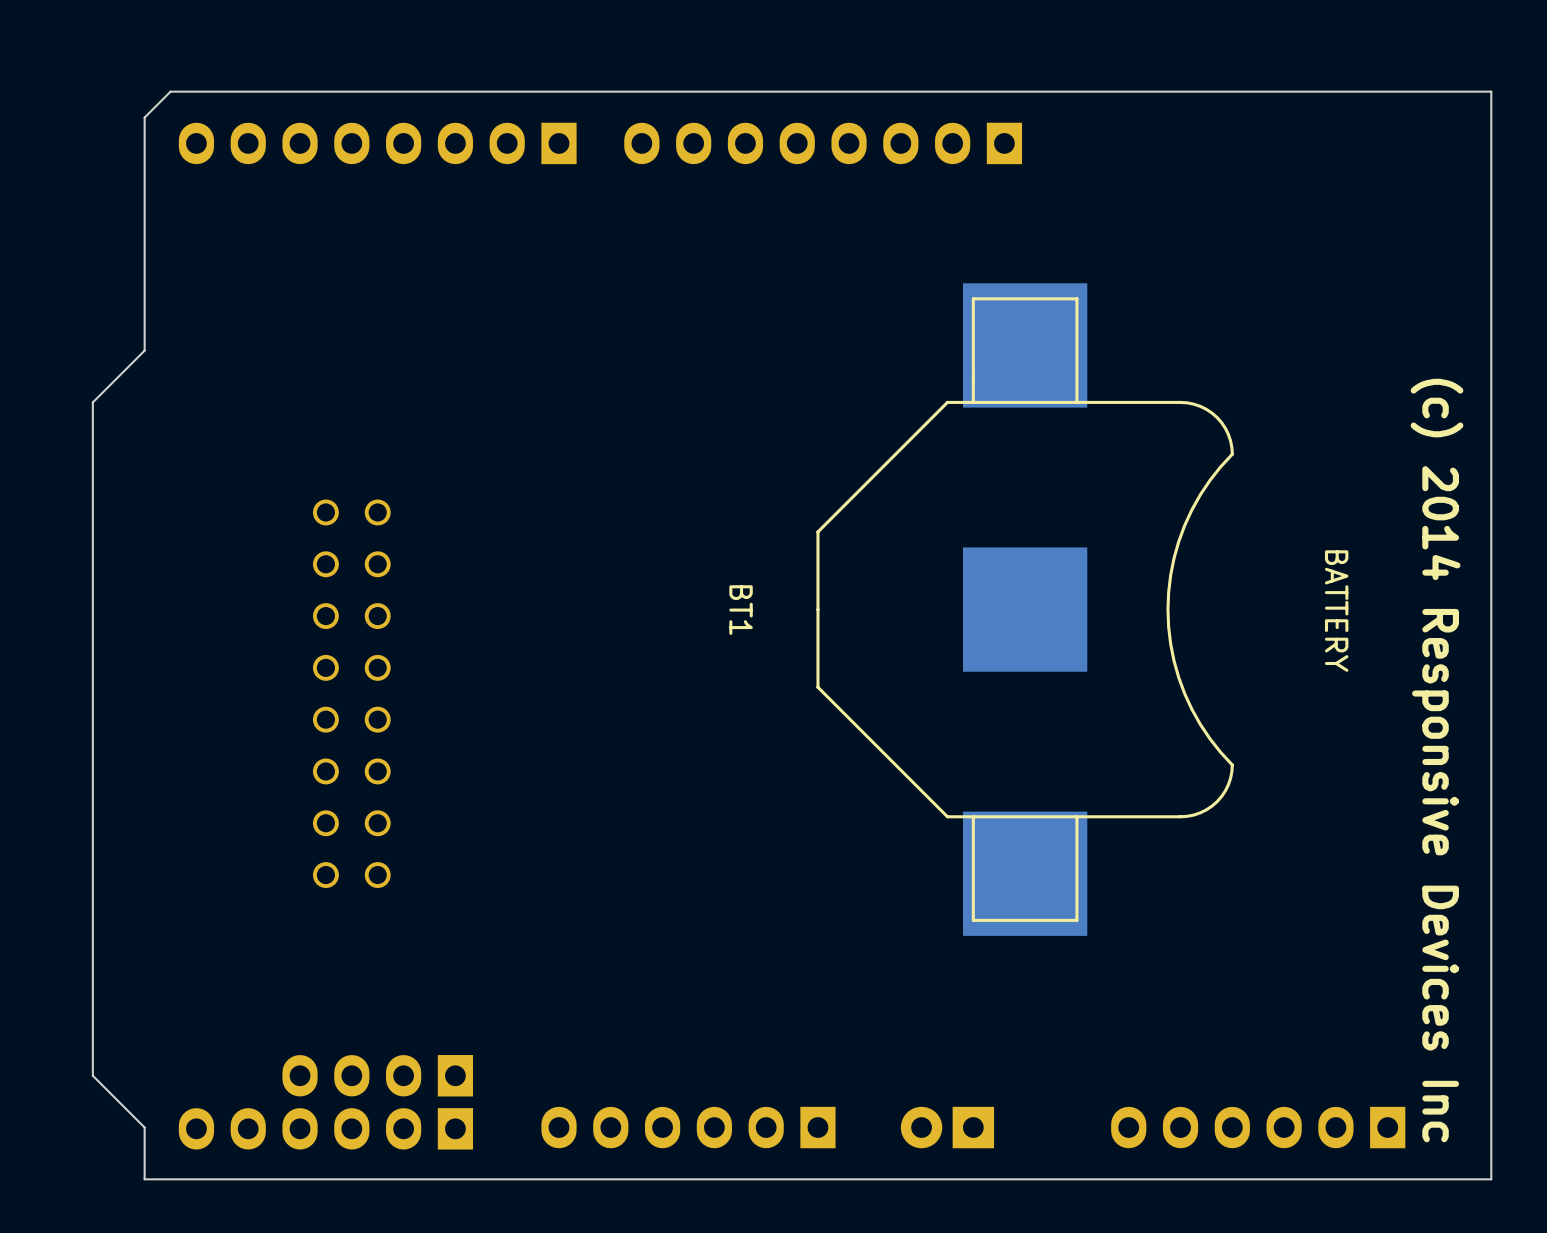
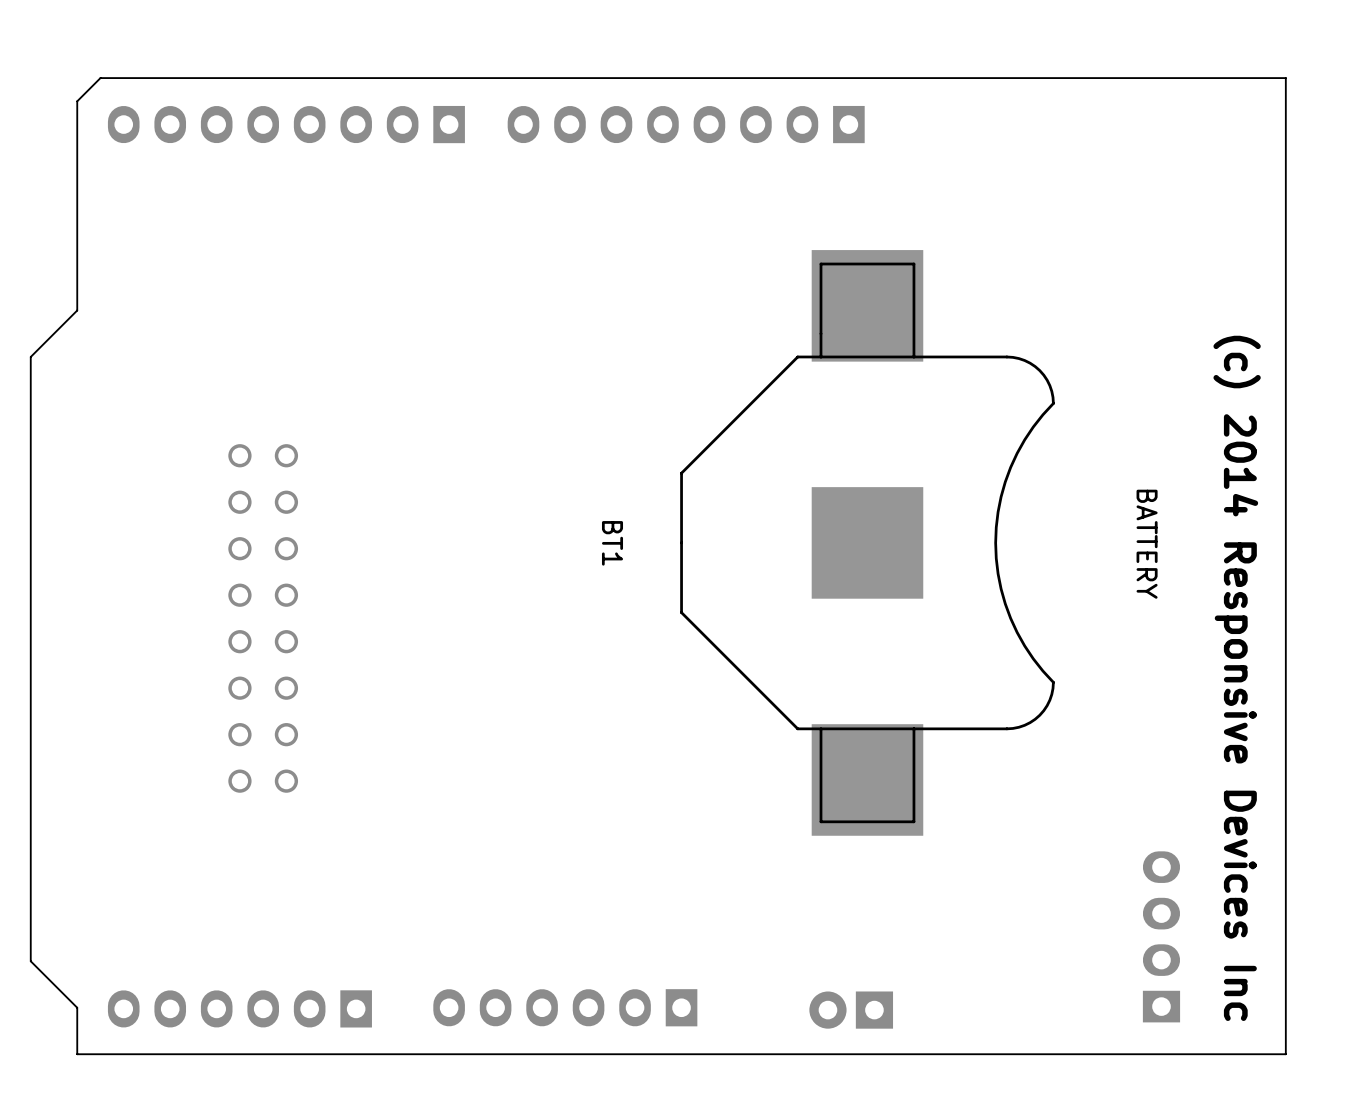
part: none -> (1161, 936)
part: (377, 1075) -> none
part position: (947, 1127) -> (851, 1010)
part: (1258, 1127) -> none

